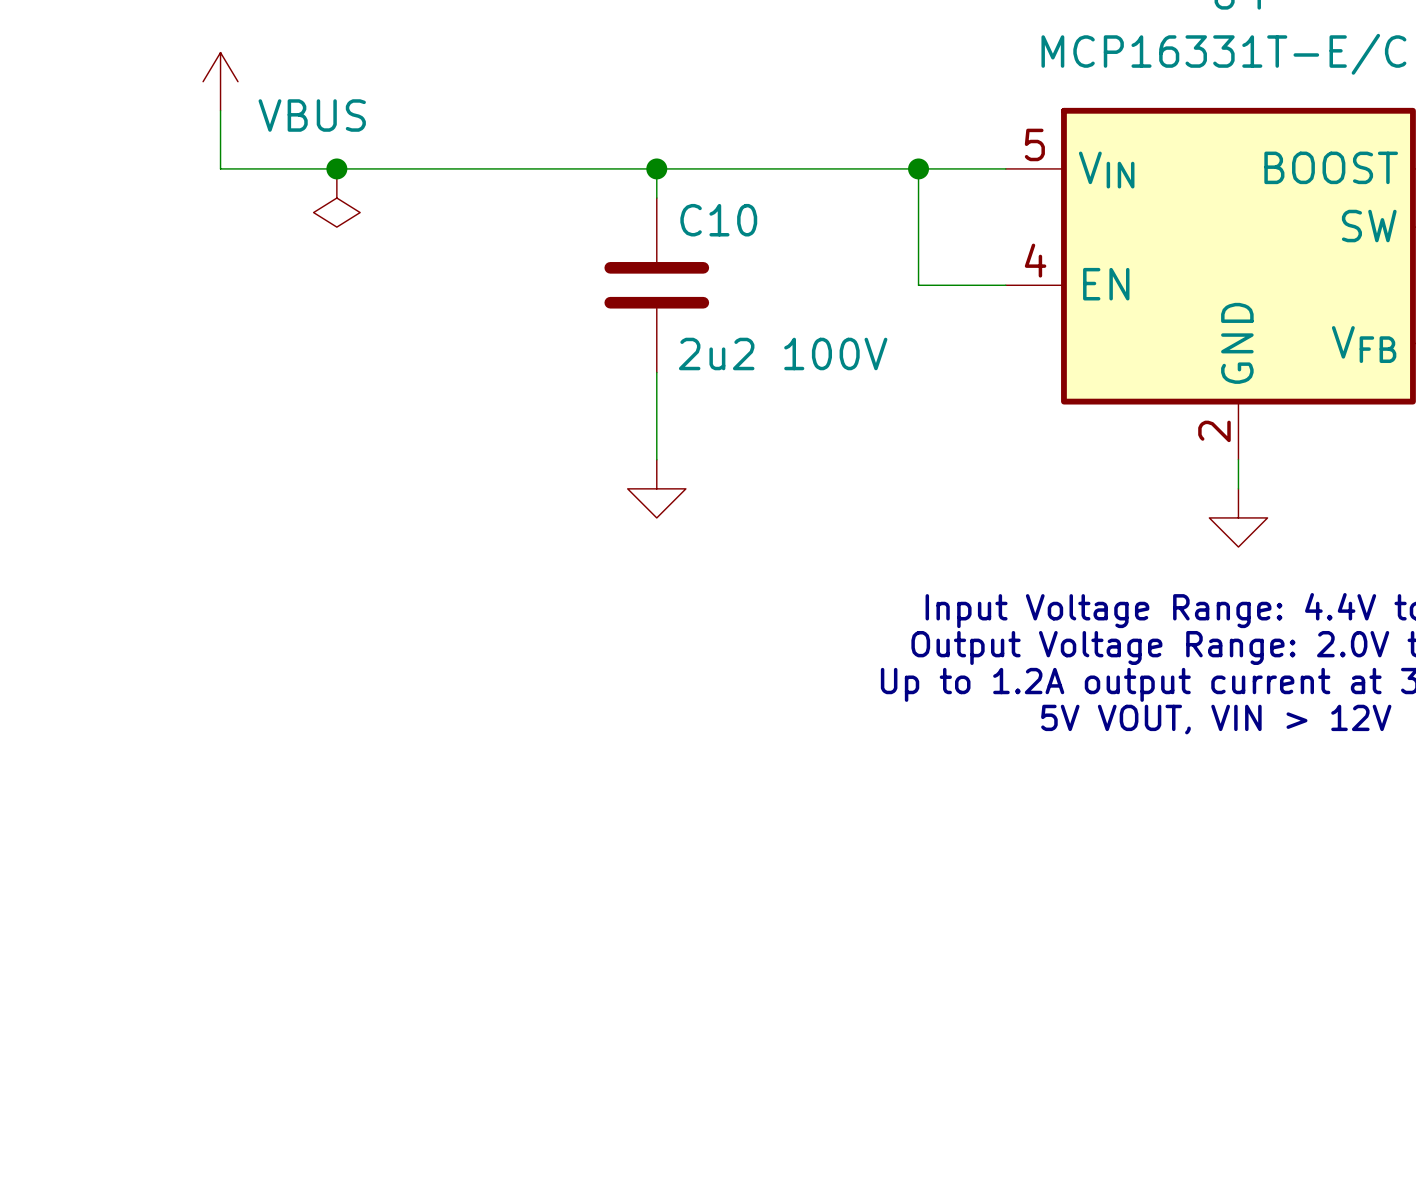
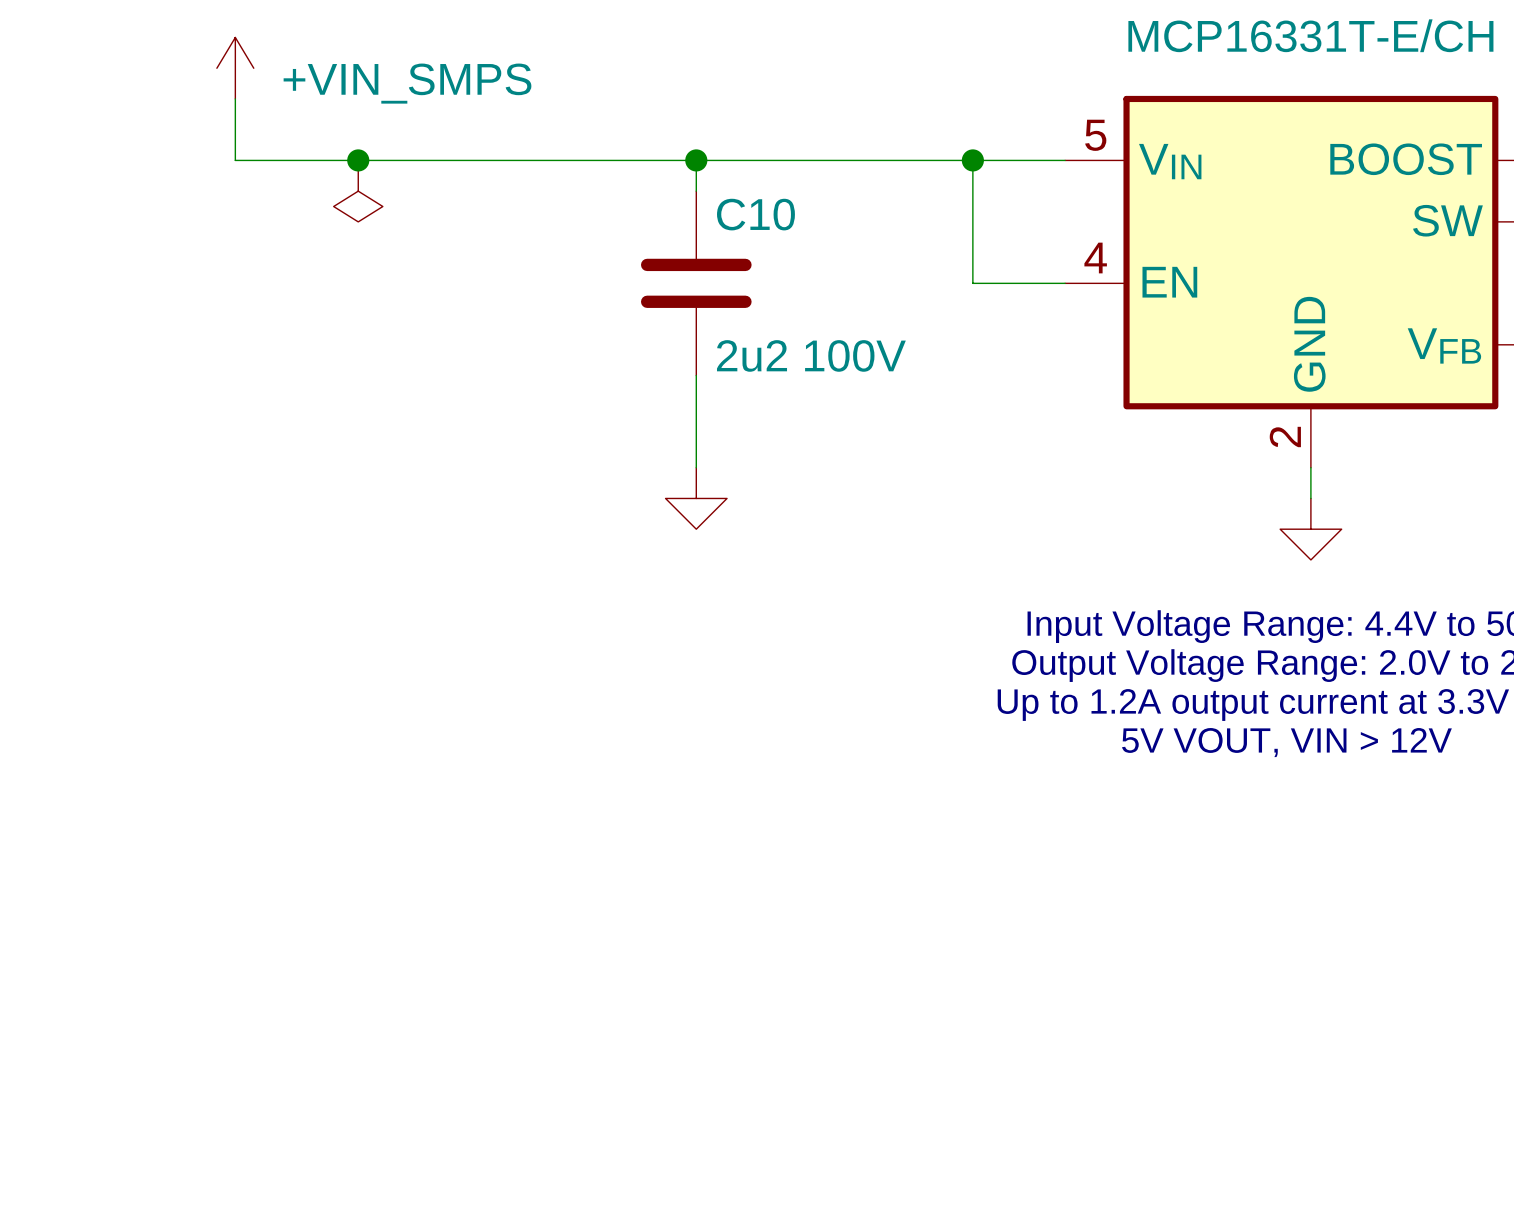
power symbol: VBUS (220, 81) -> +VIN_SMPS (235, 68)

